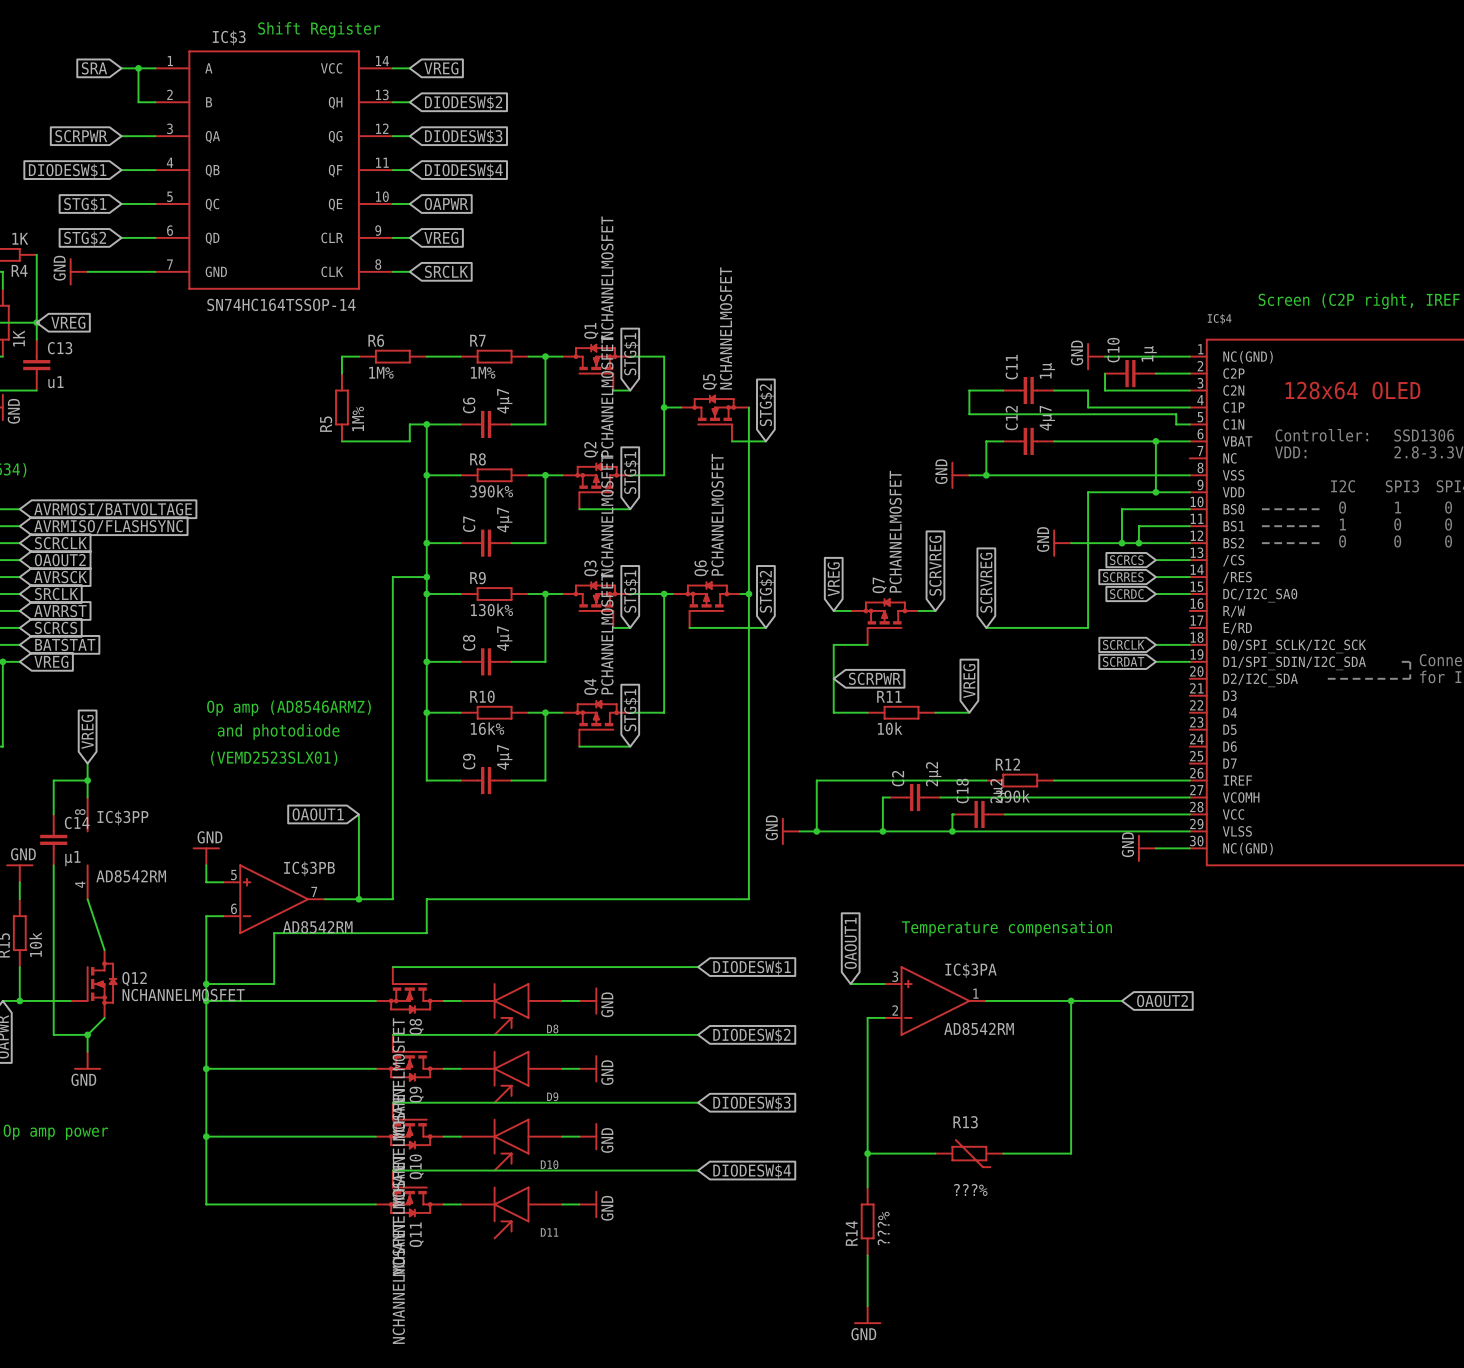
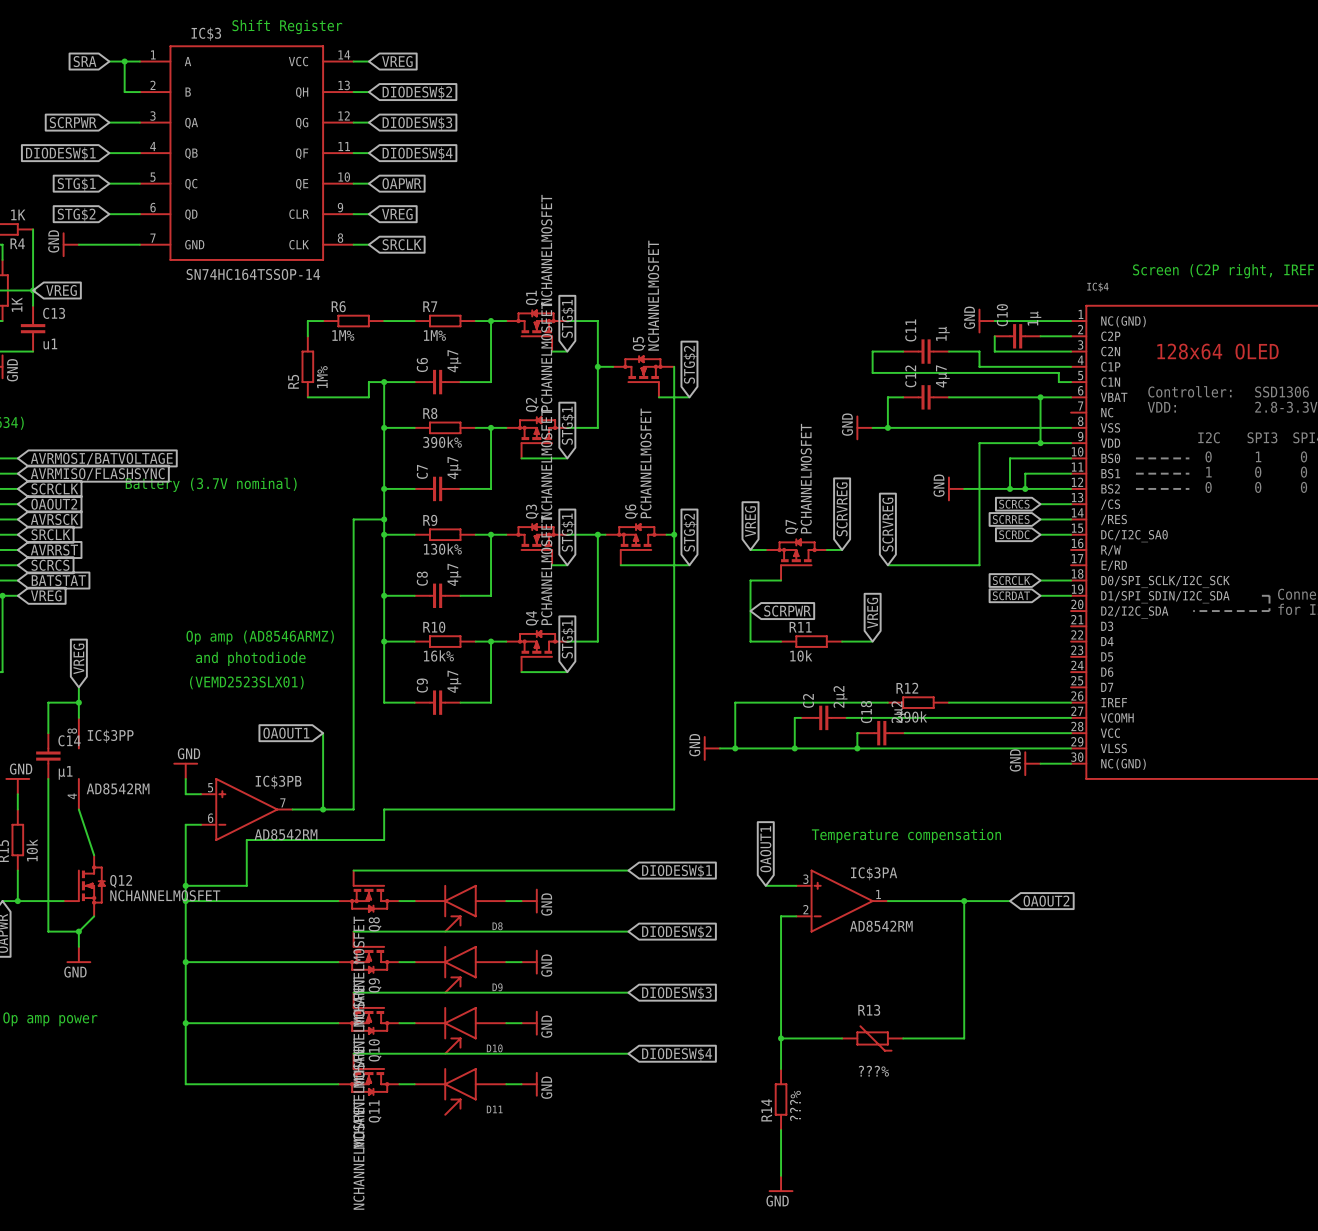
text: none -> Battery (3.7V nominal) (211, 484)

